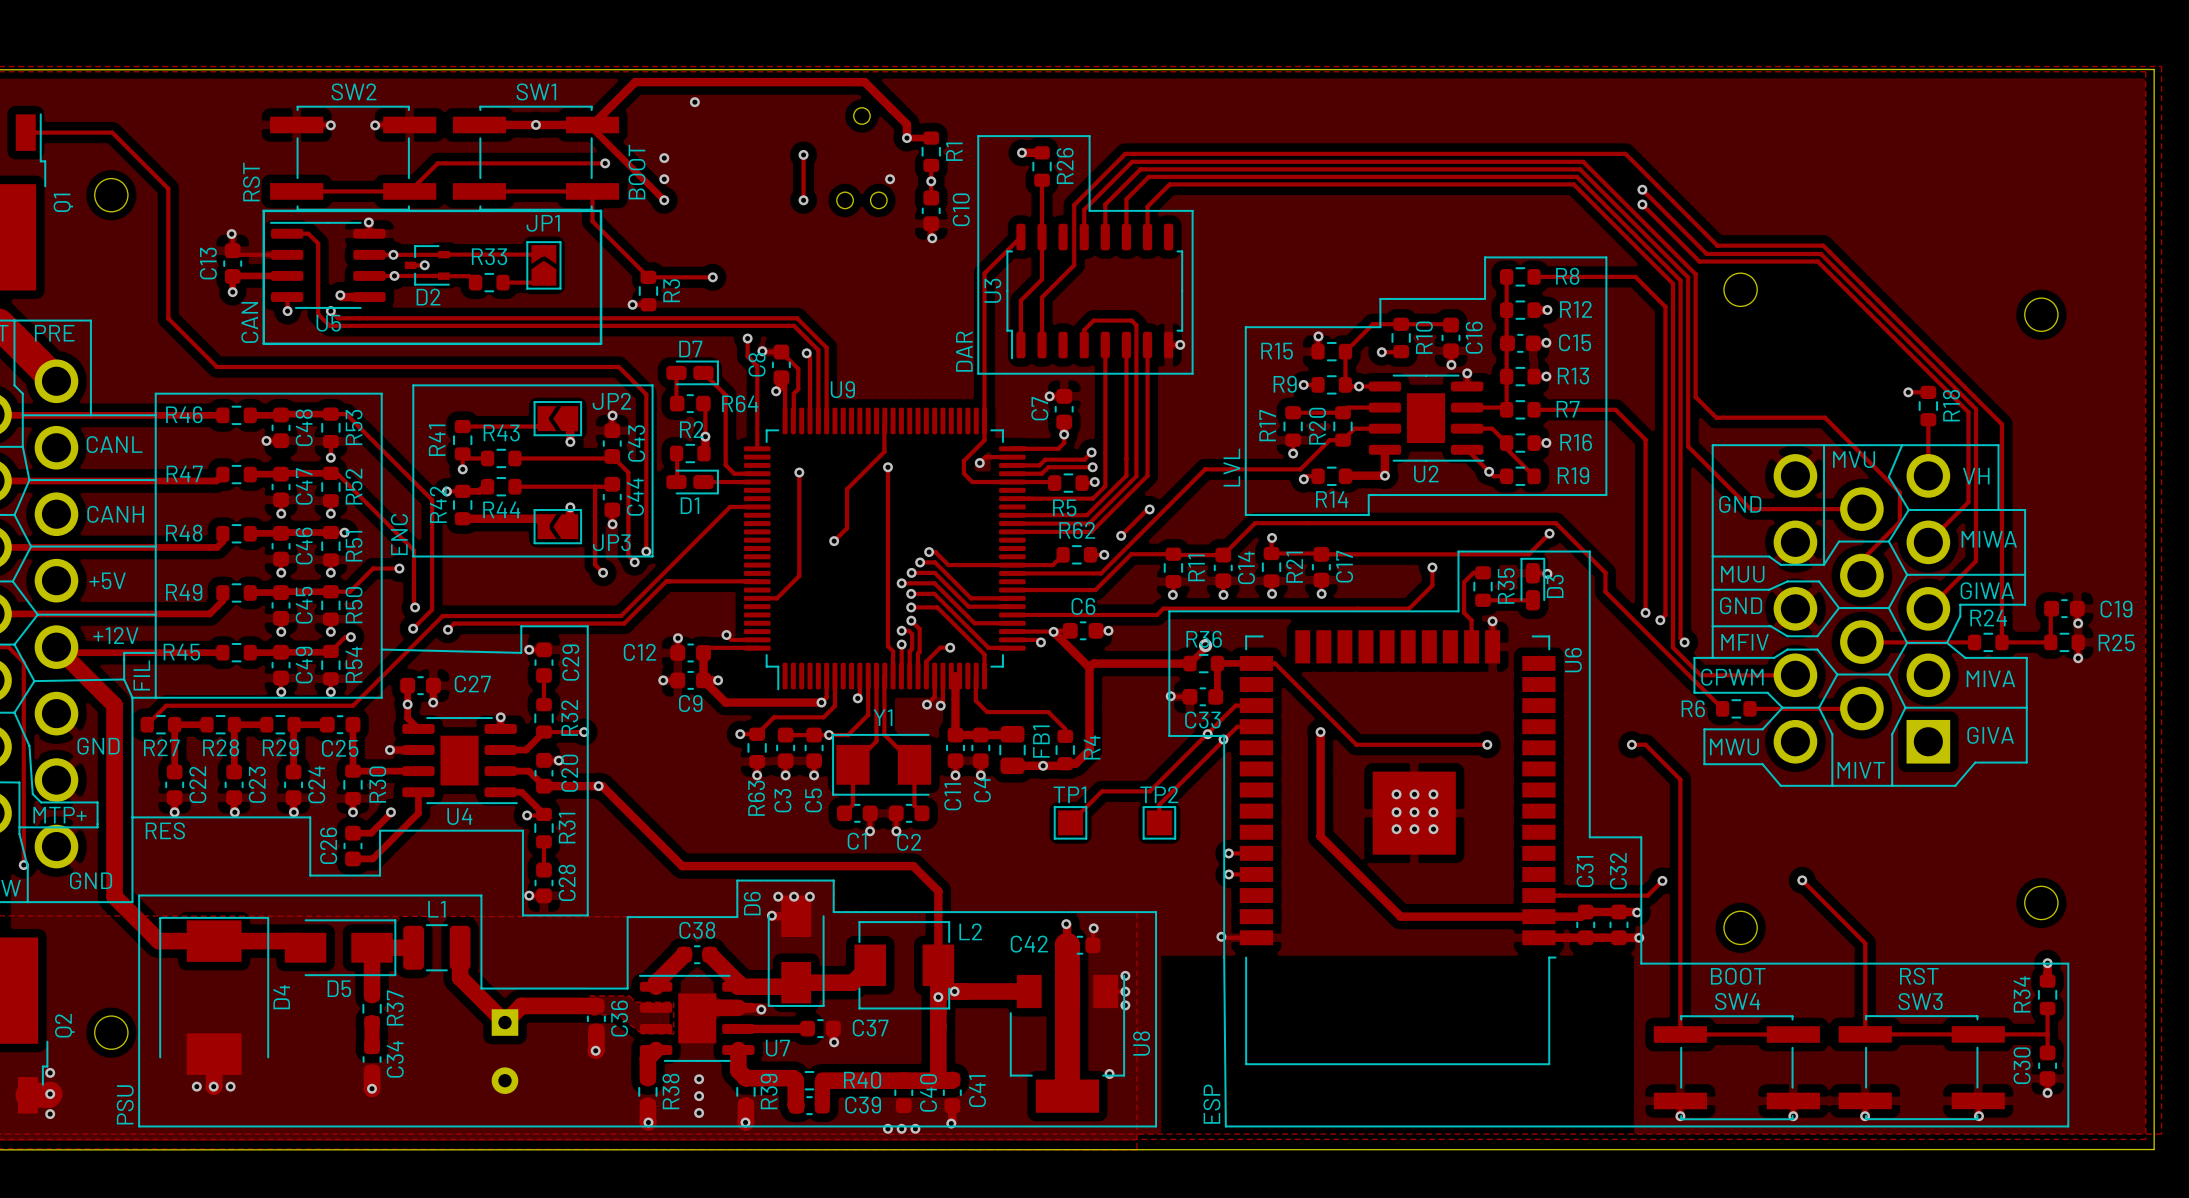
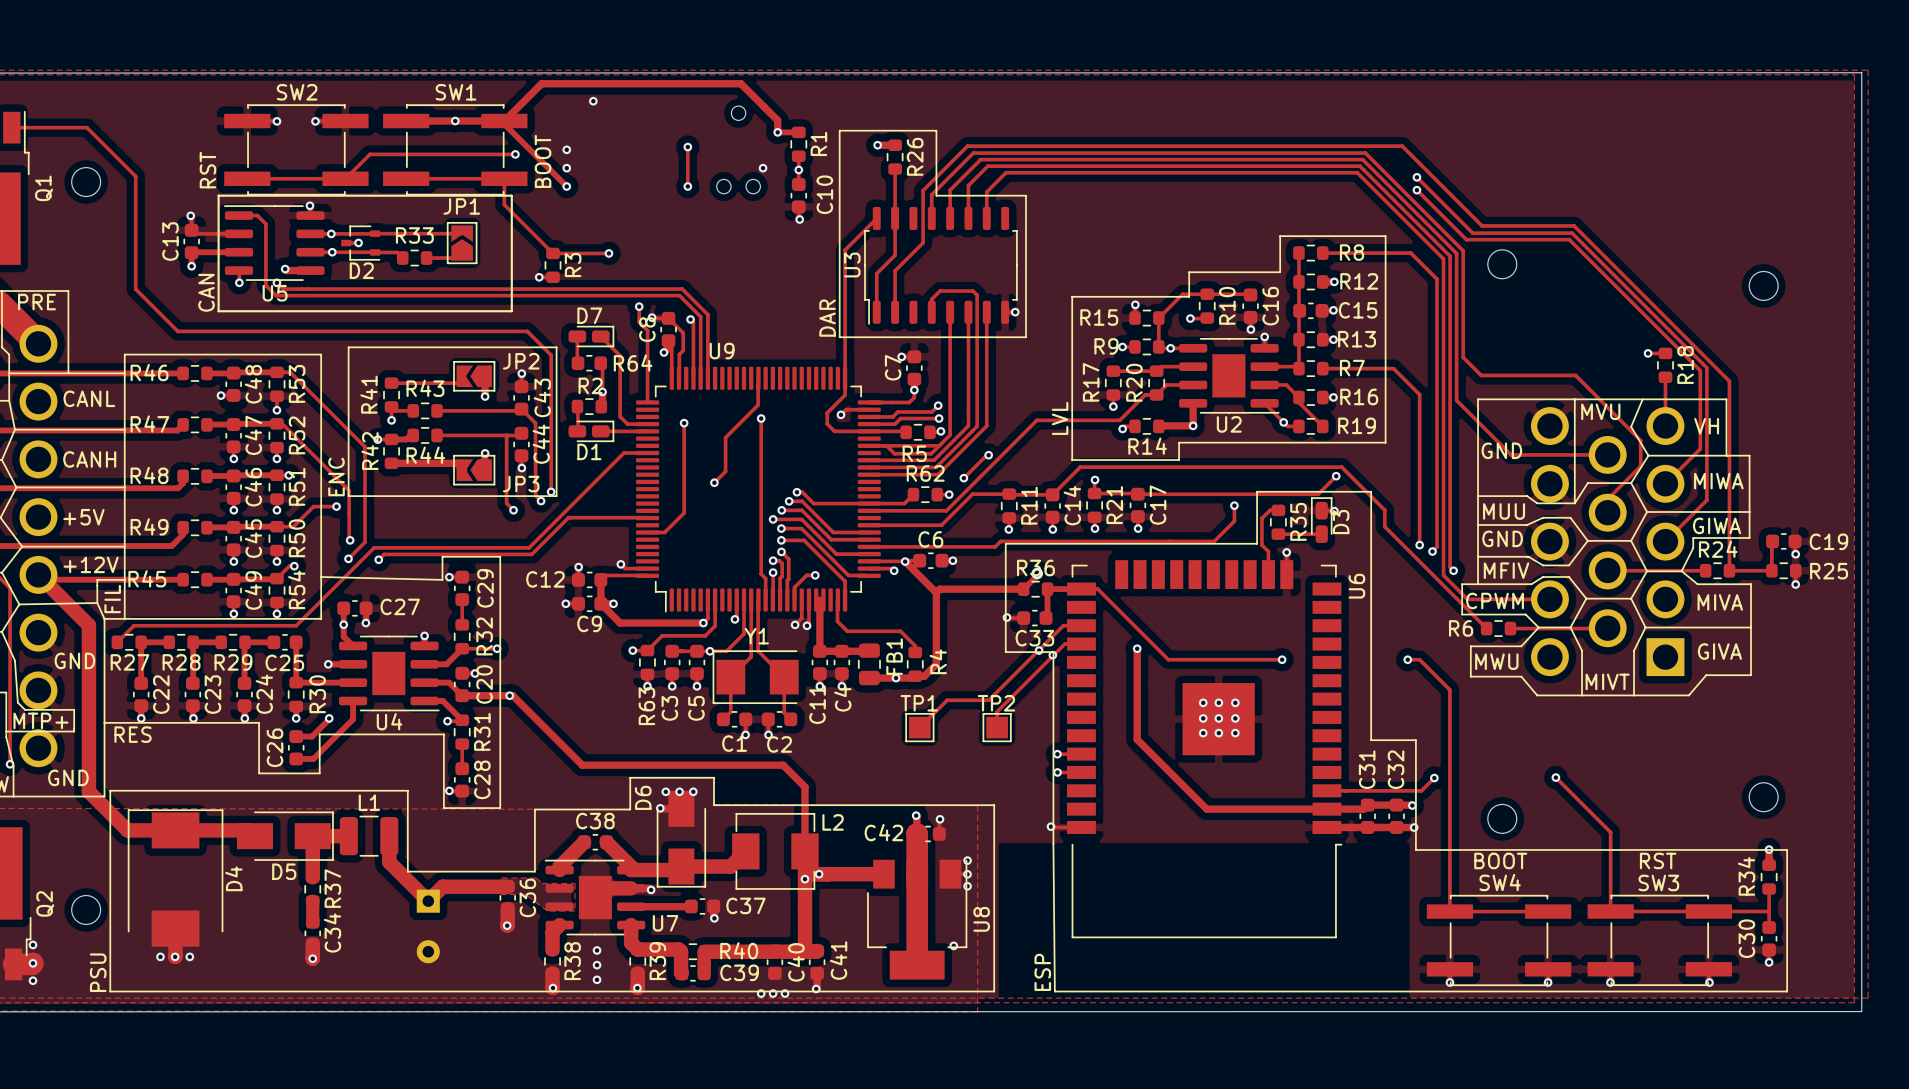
track: none -> (942, 442) (931, 453) (894, 453) (886, 445)

